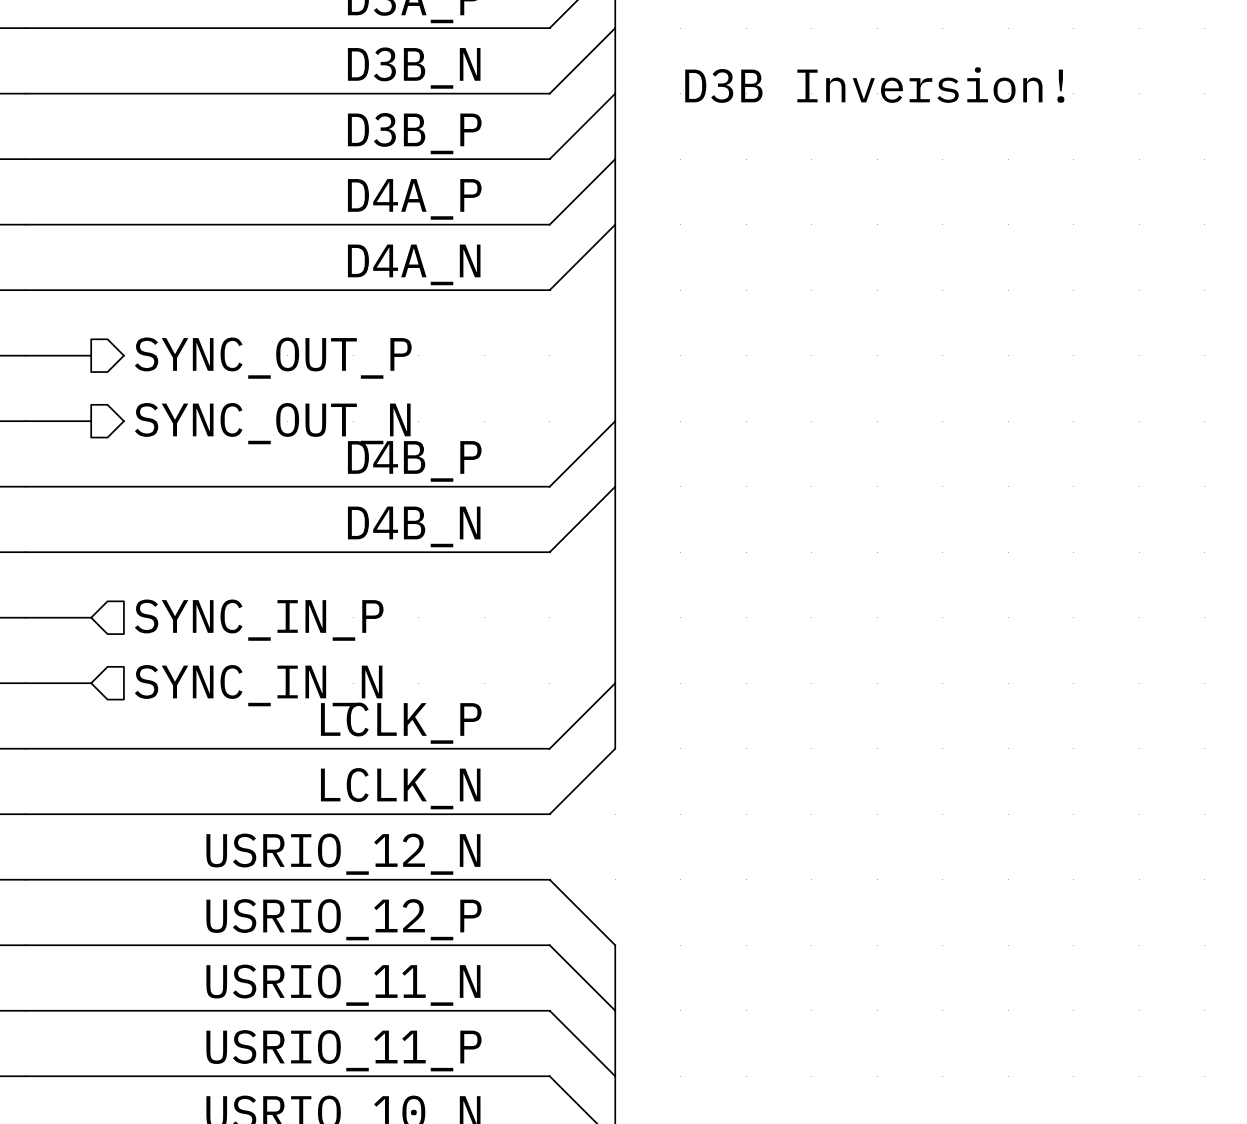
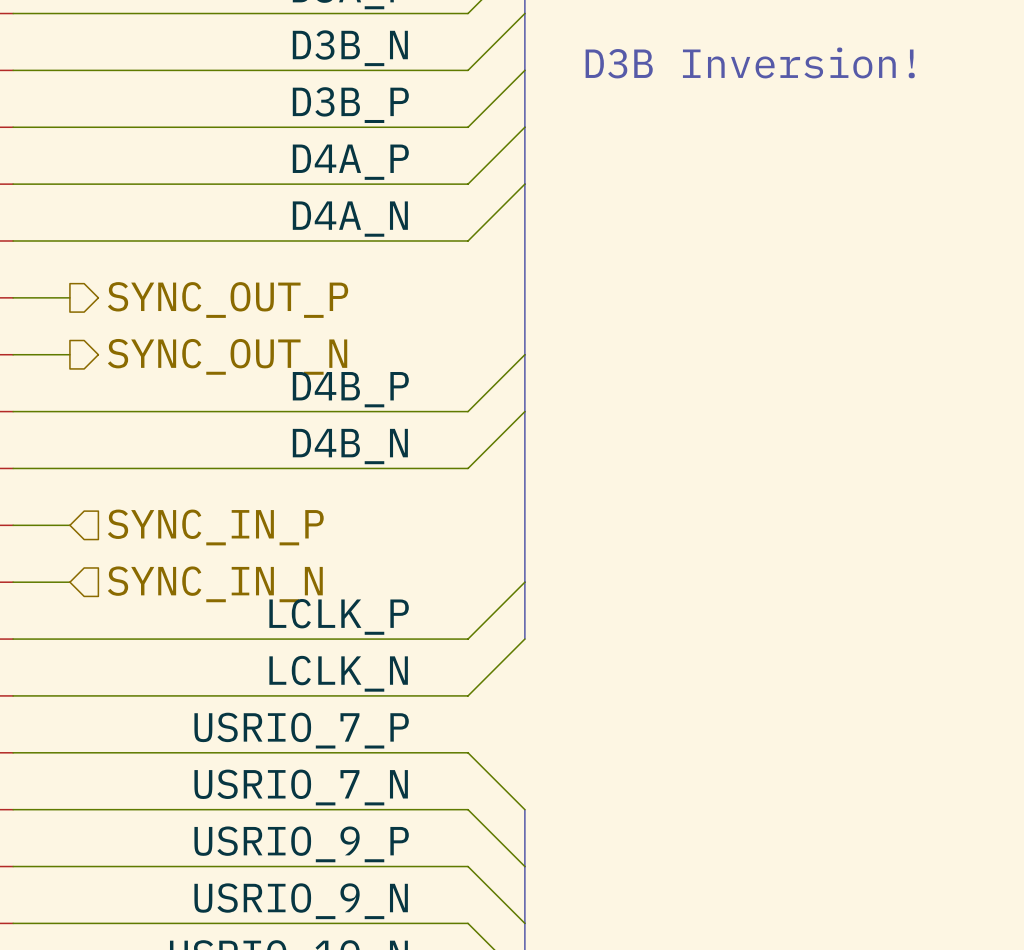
label: USRIO_12_N (343, 854) -> USRIO_7_P (301, 730)
label: USRIO_12_P (343, 919) -> USRIO_7_N (301, 787)
label: USRIO_11_N (343, 985) -> USRIO_9_P (301, 844)
label: USRIO_11_P (343, 1050) -> USRIO_9_N (301, 901)

